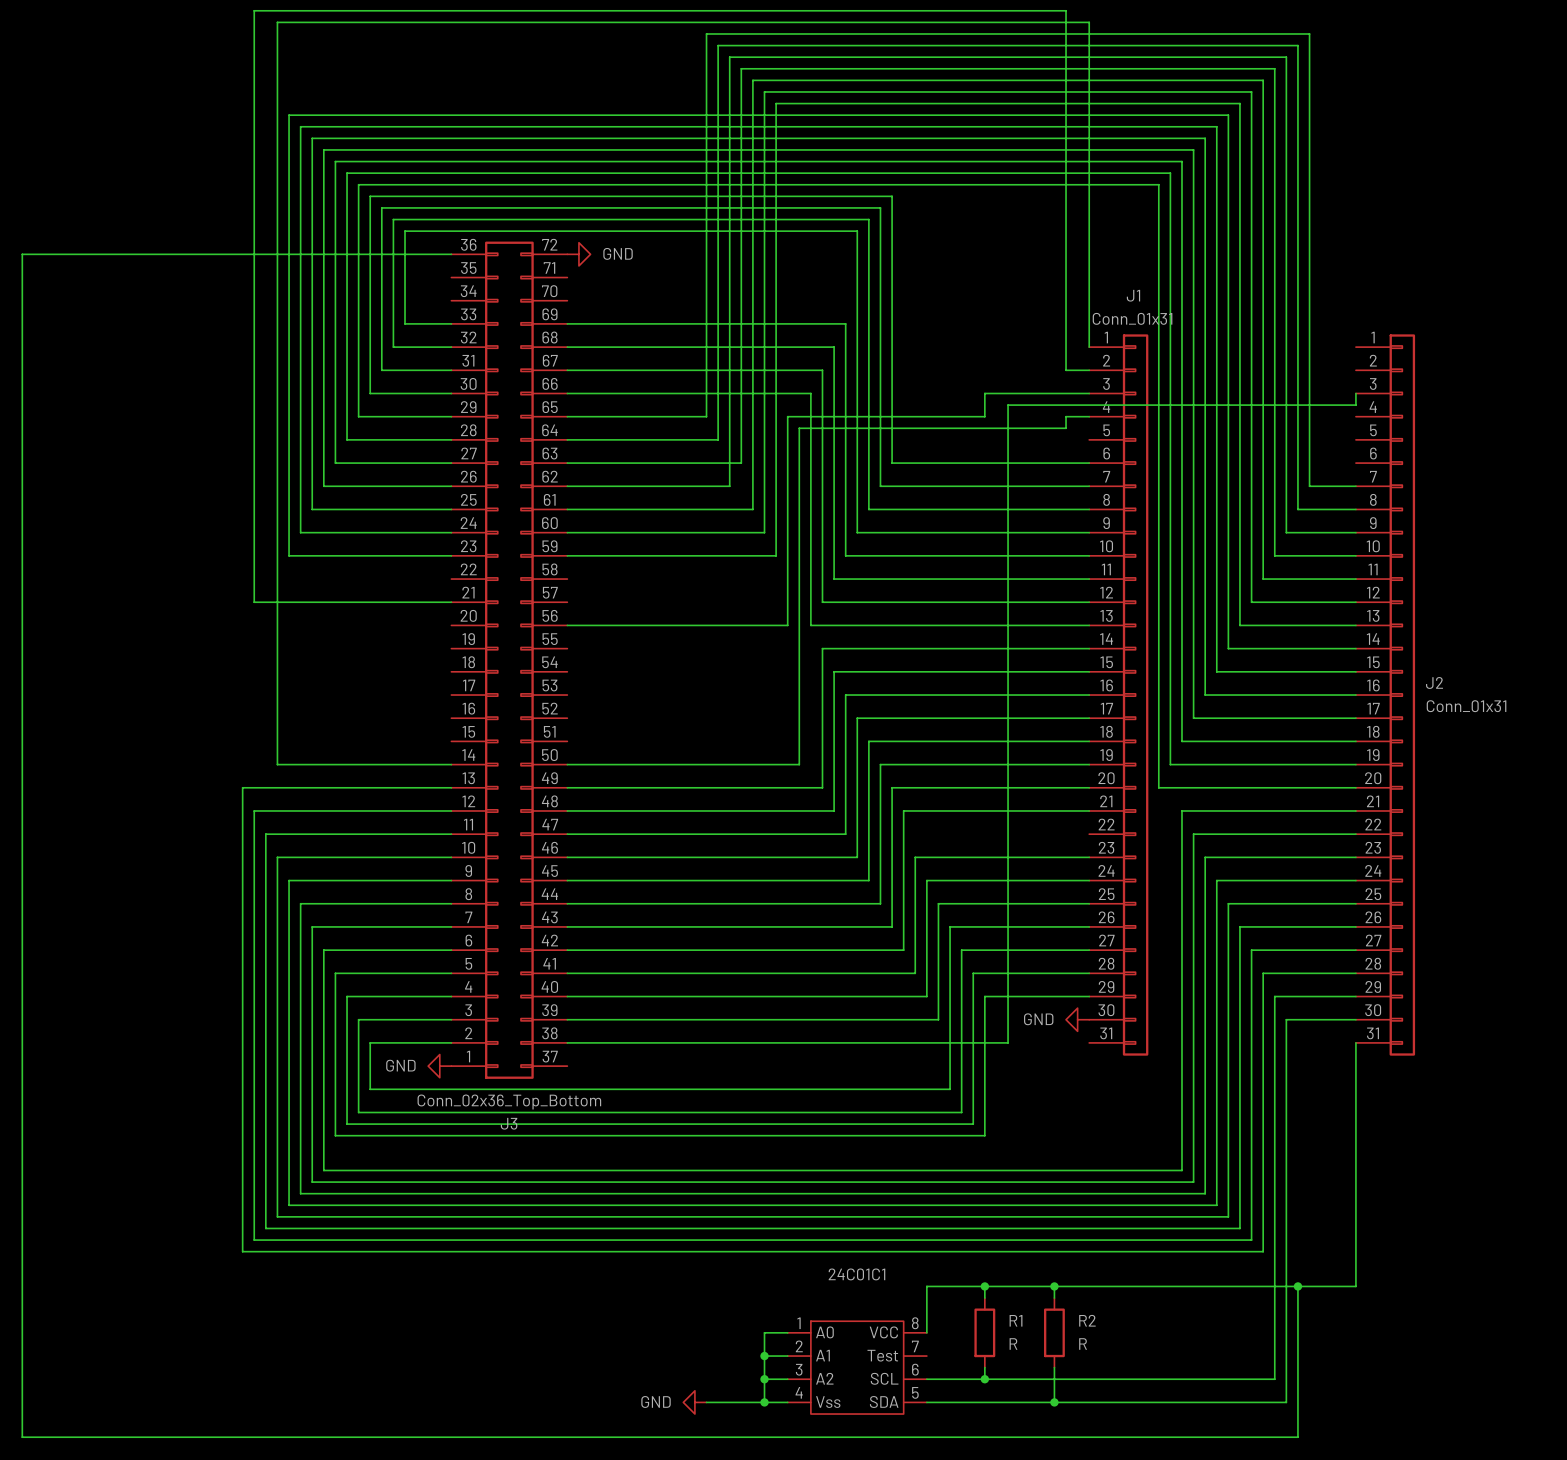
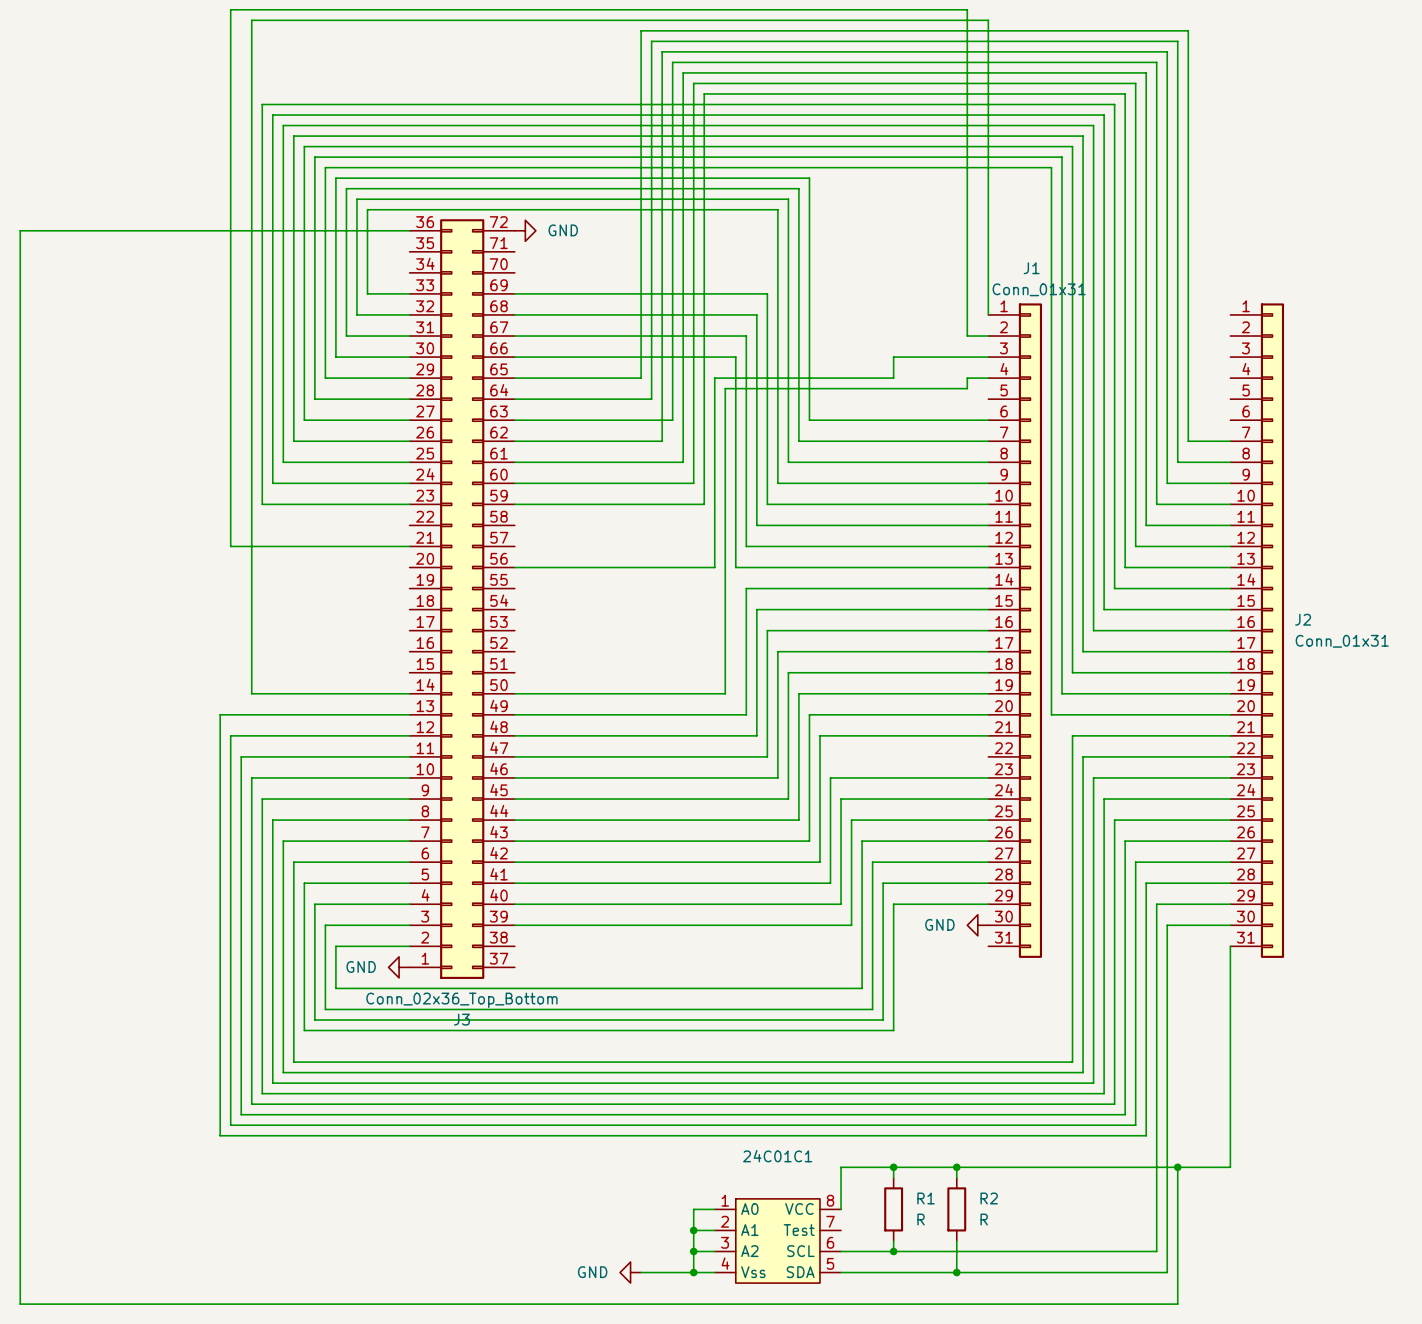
wire: (1355, 393) (1355, 405) (1008, 405) (1008, 1042) (567, 1042) -> none

